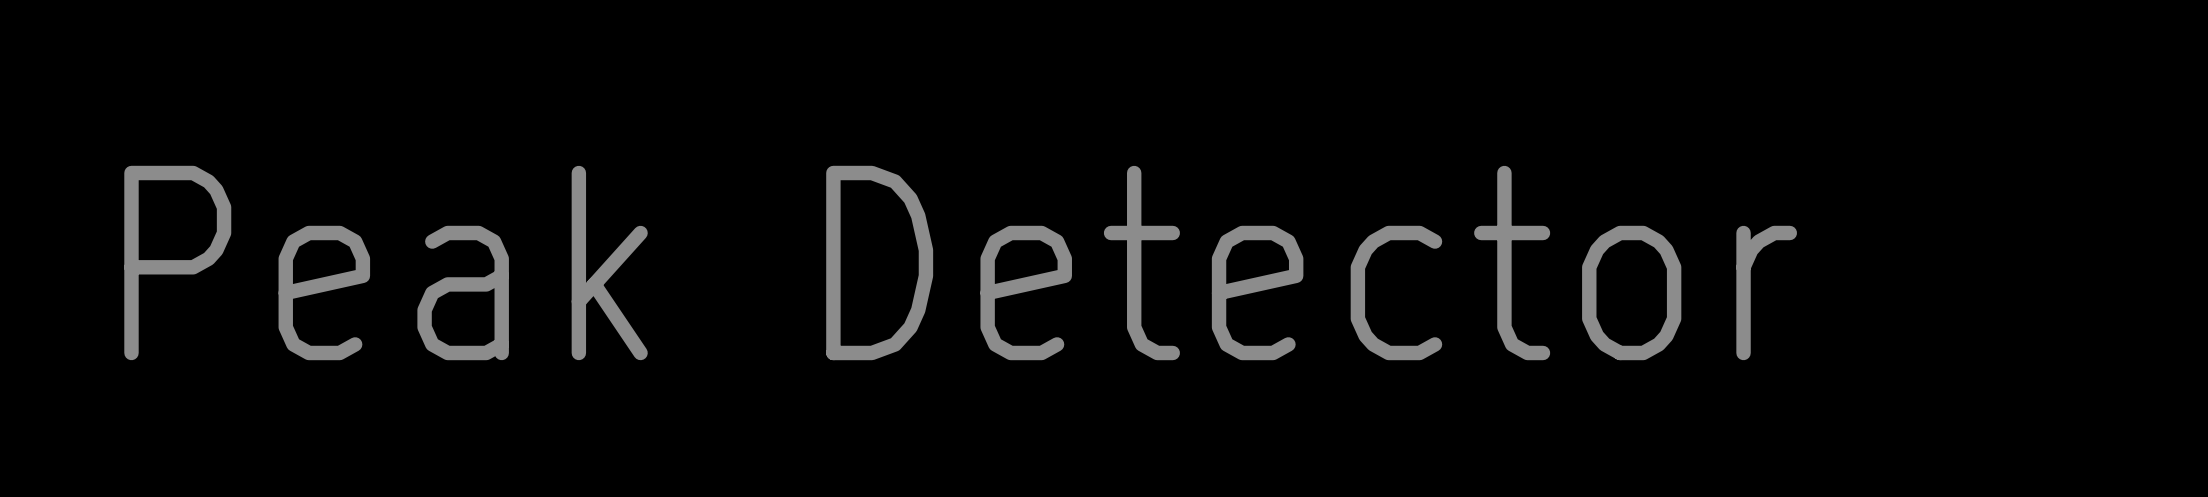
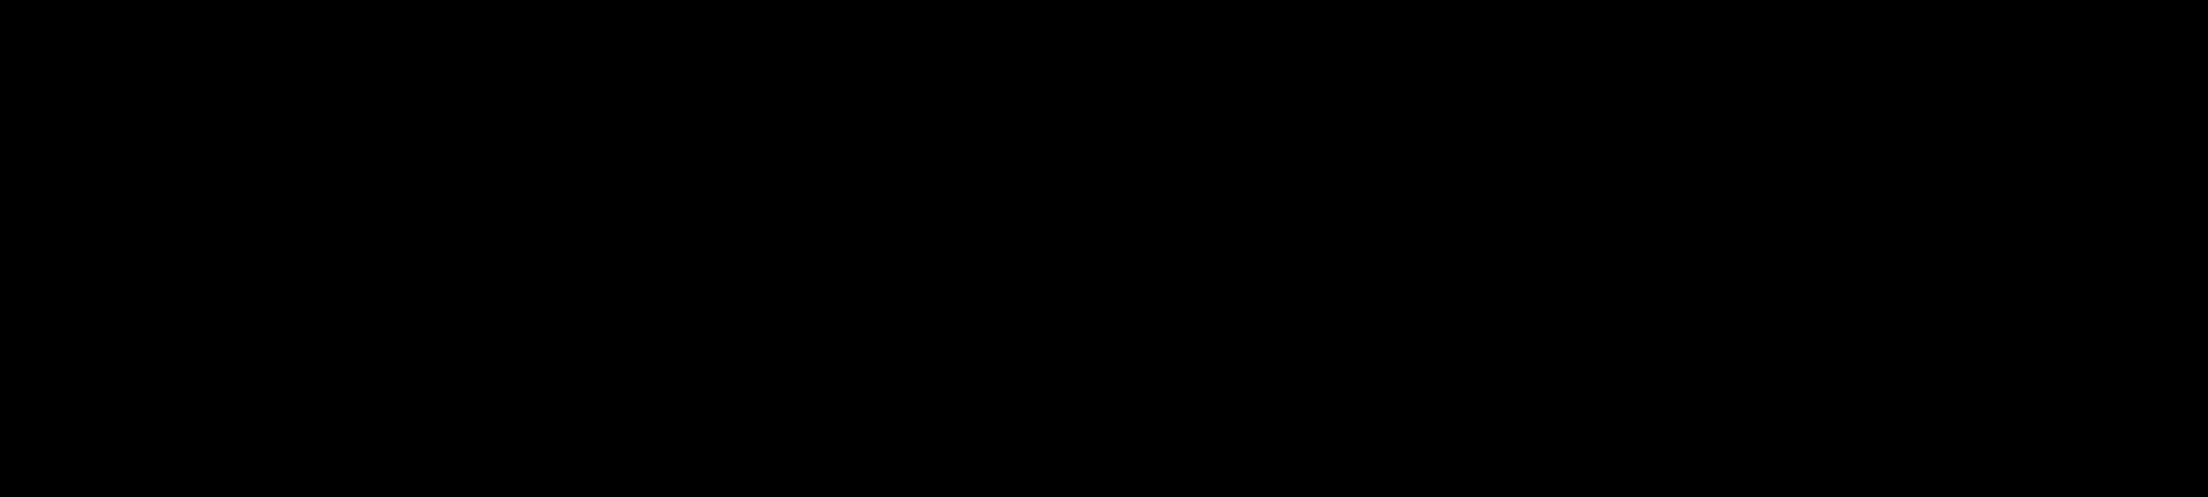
text: Peak Detector (960, 263) -> none

